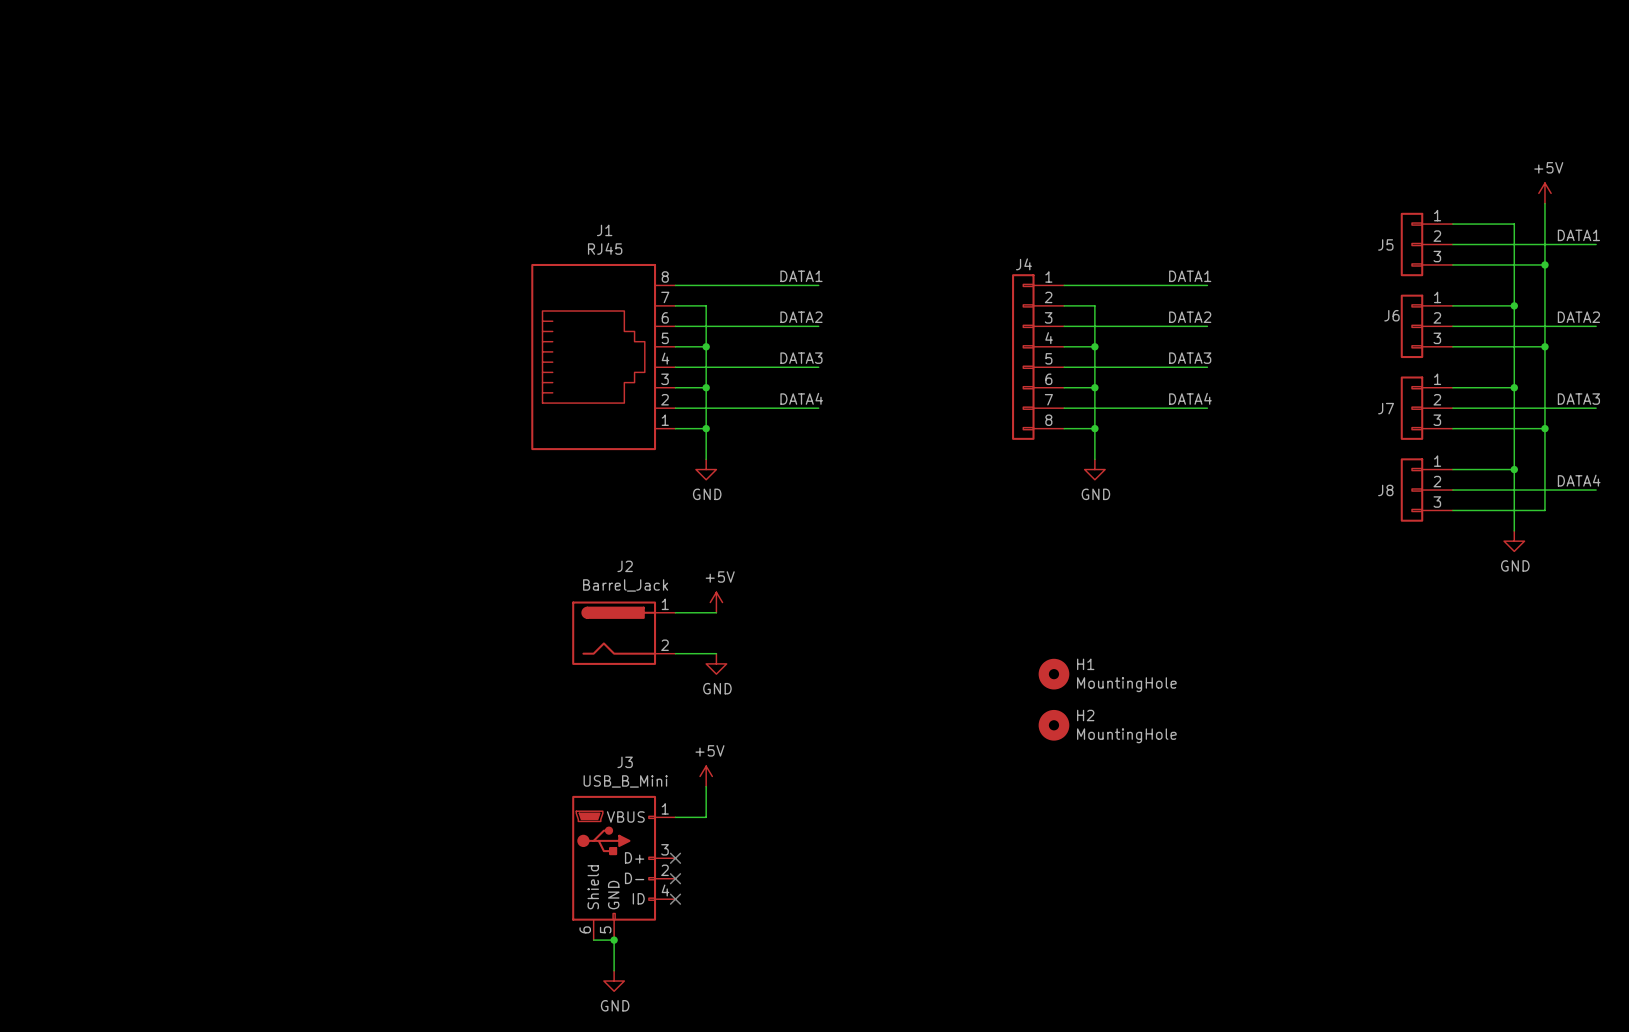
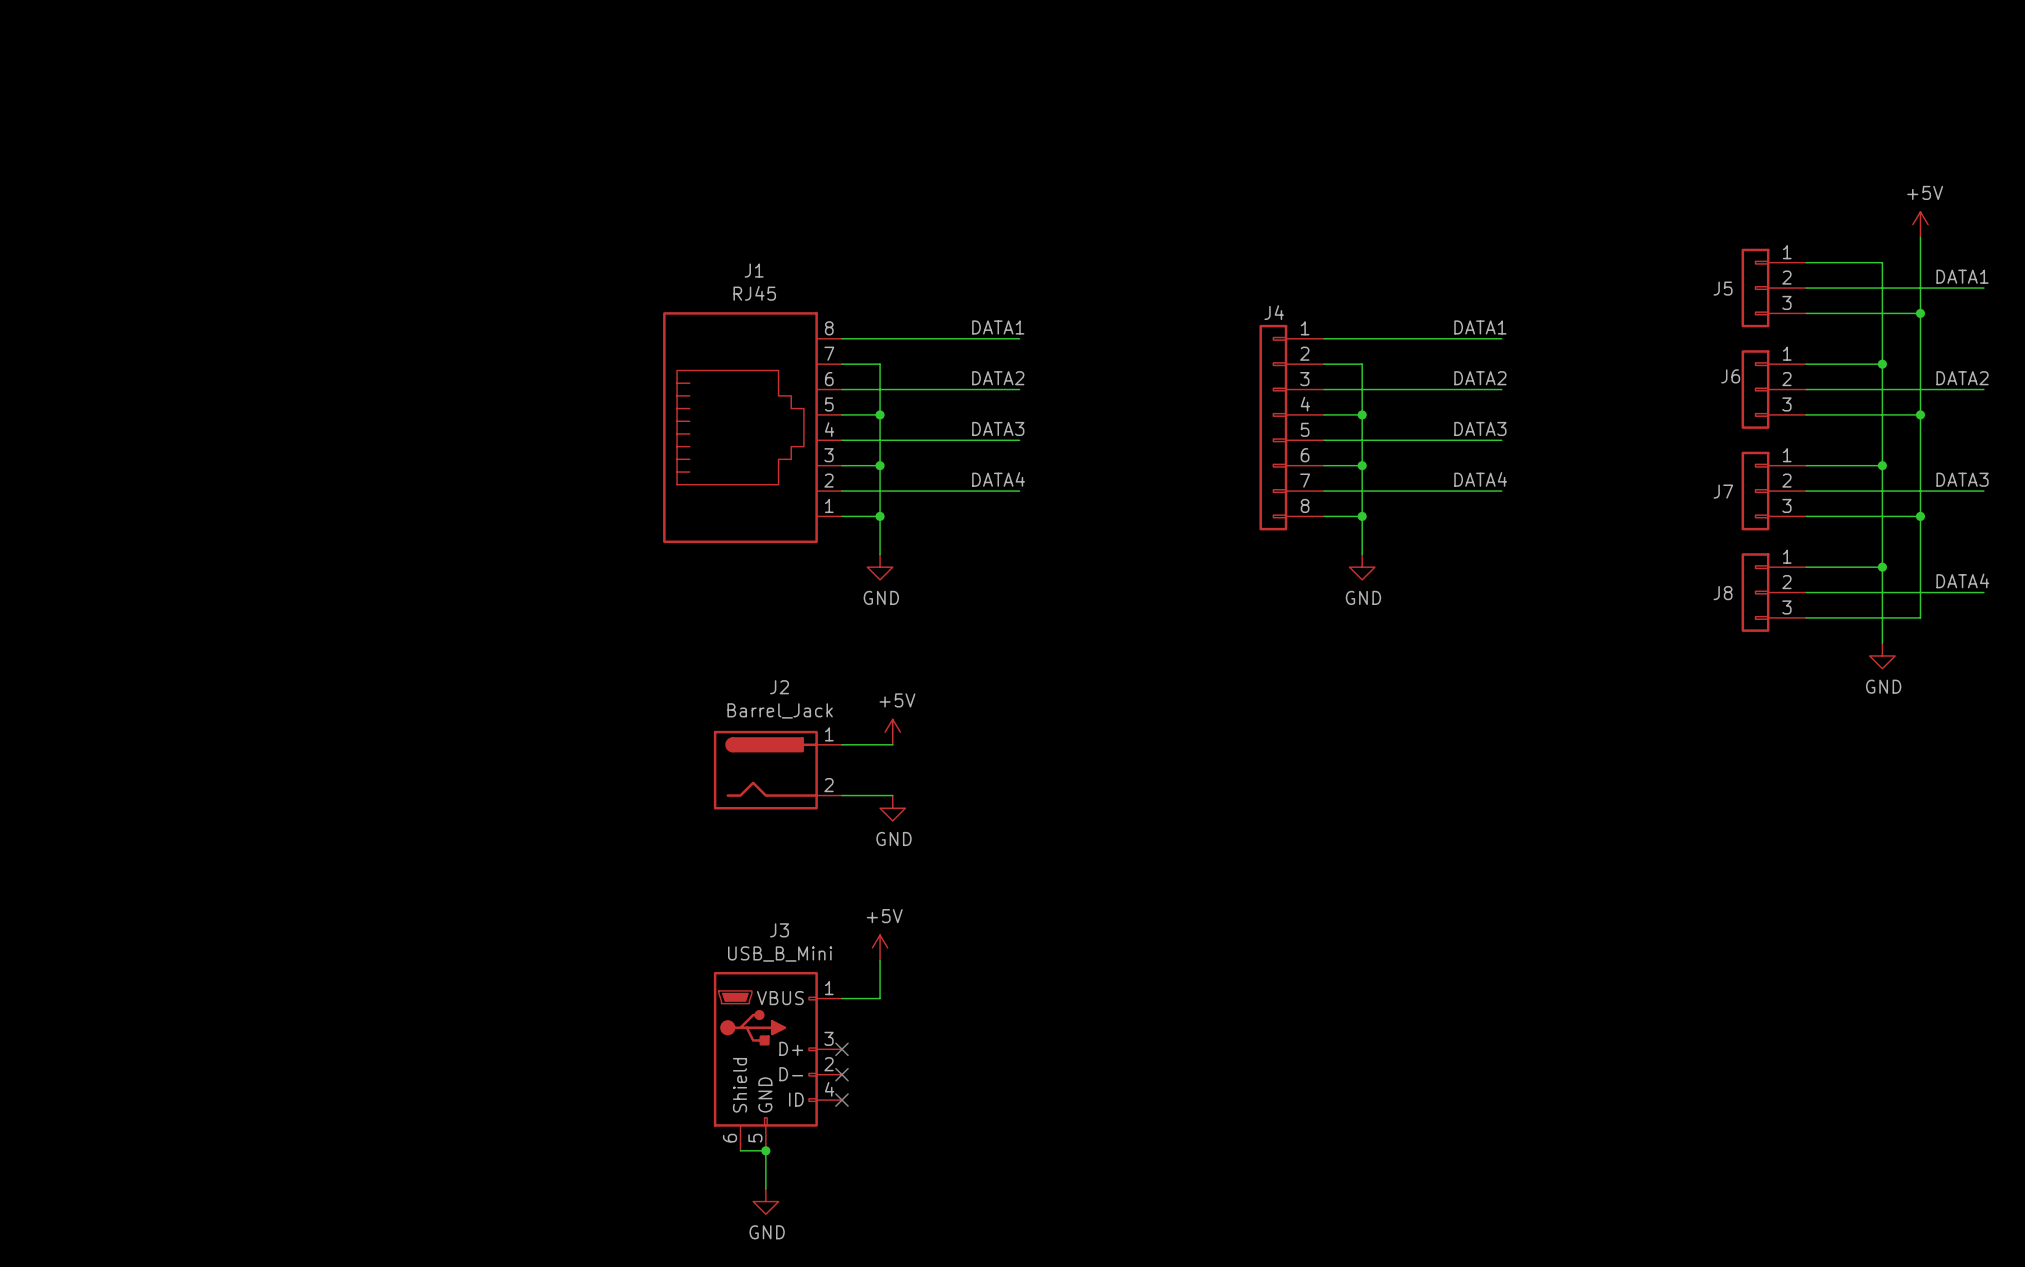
H1: MountingHole (1053, 674) -> none
H2: MountingHole (1053, 725) -> none

